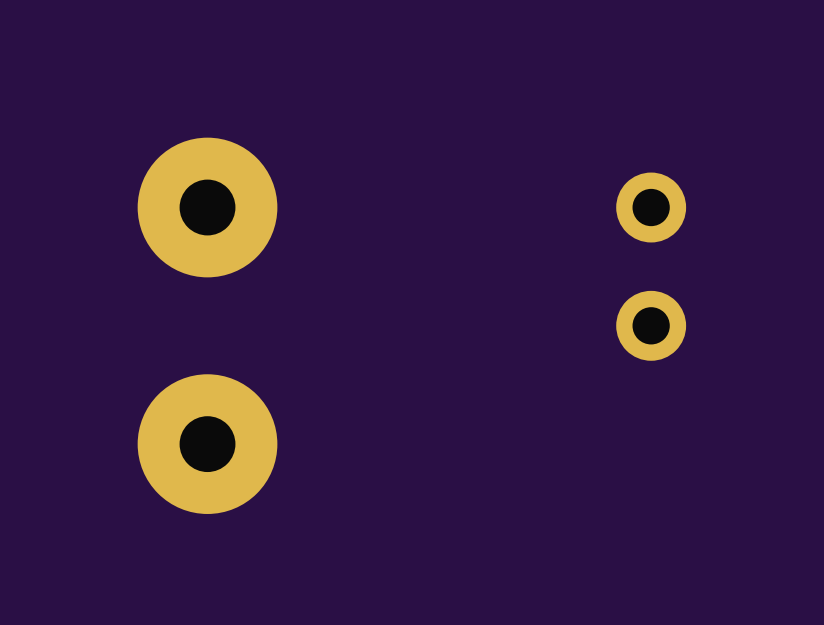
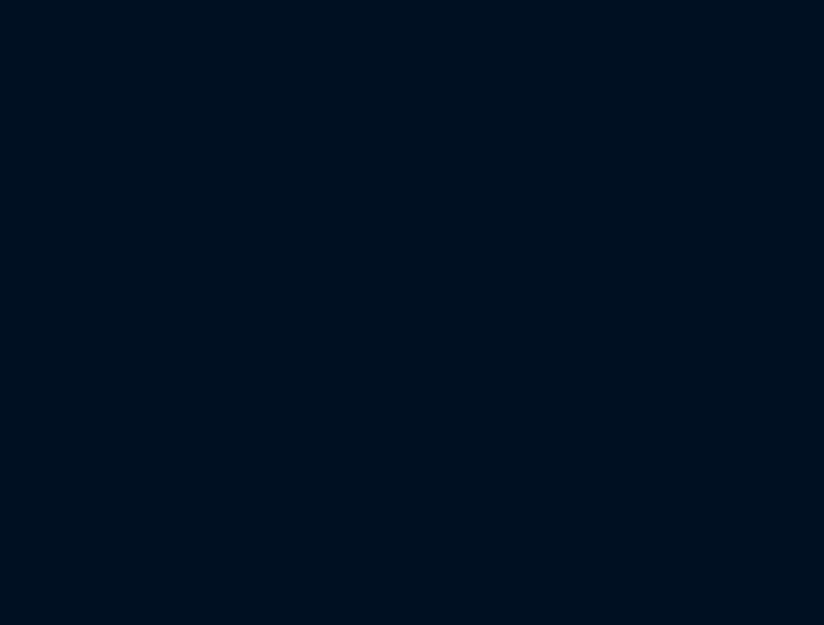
part: (651, 266) -> none
part: (207, 325) -> none

